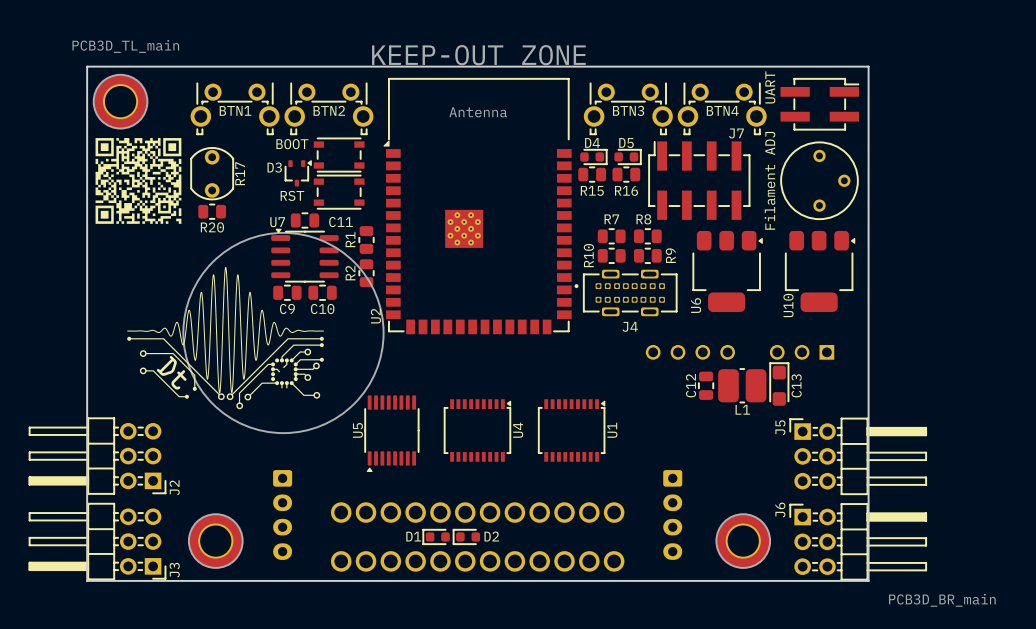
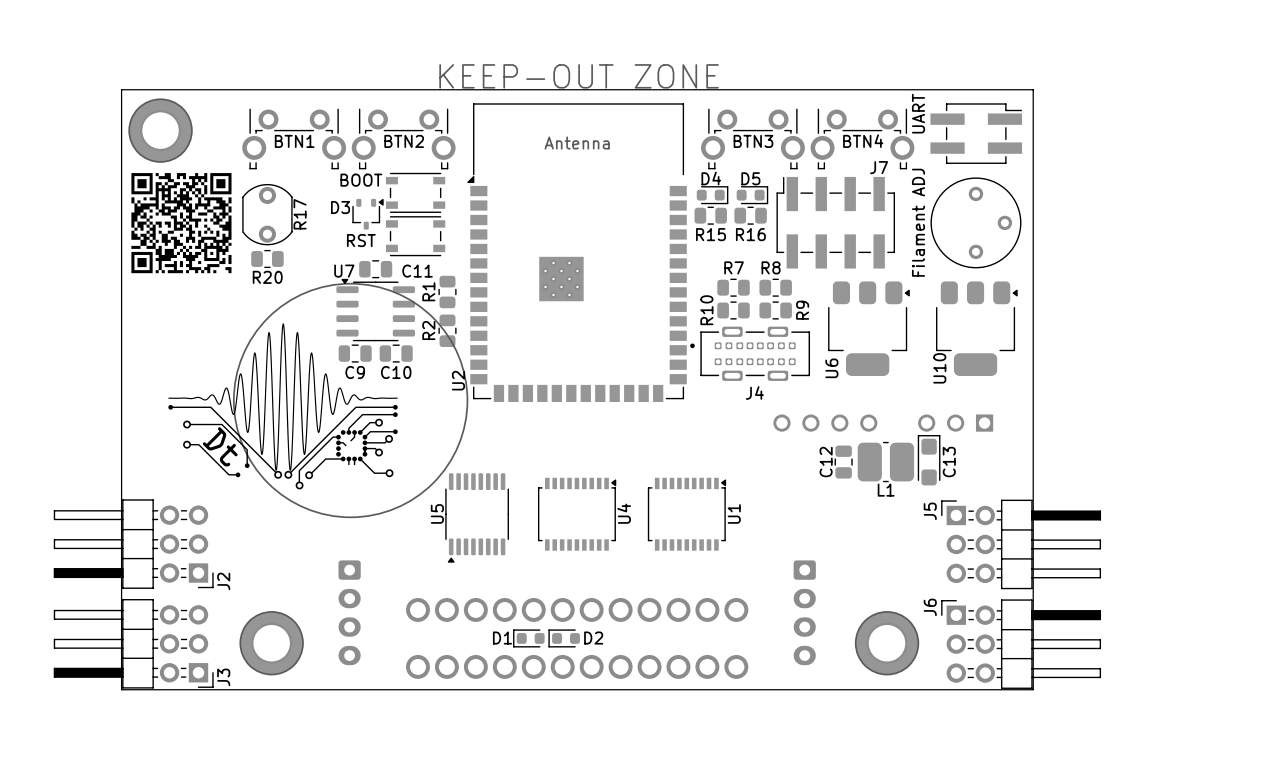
text: PCB3D_TL_main (125, 46) -> none
text: PCB3D_BR_main (942, 600) -> none

